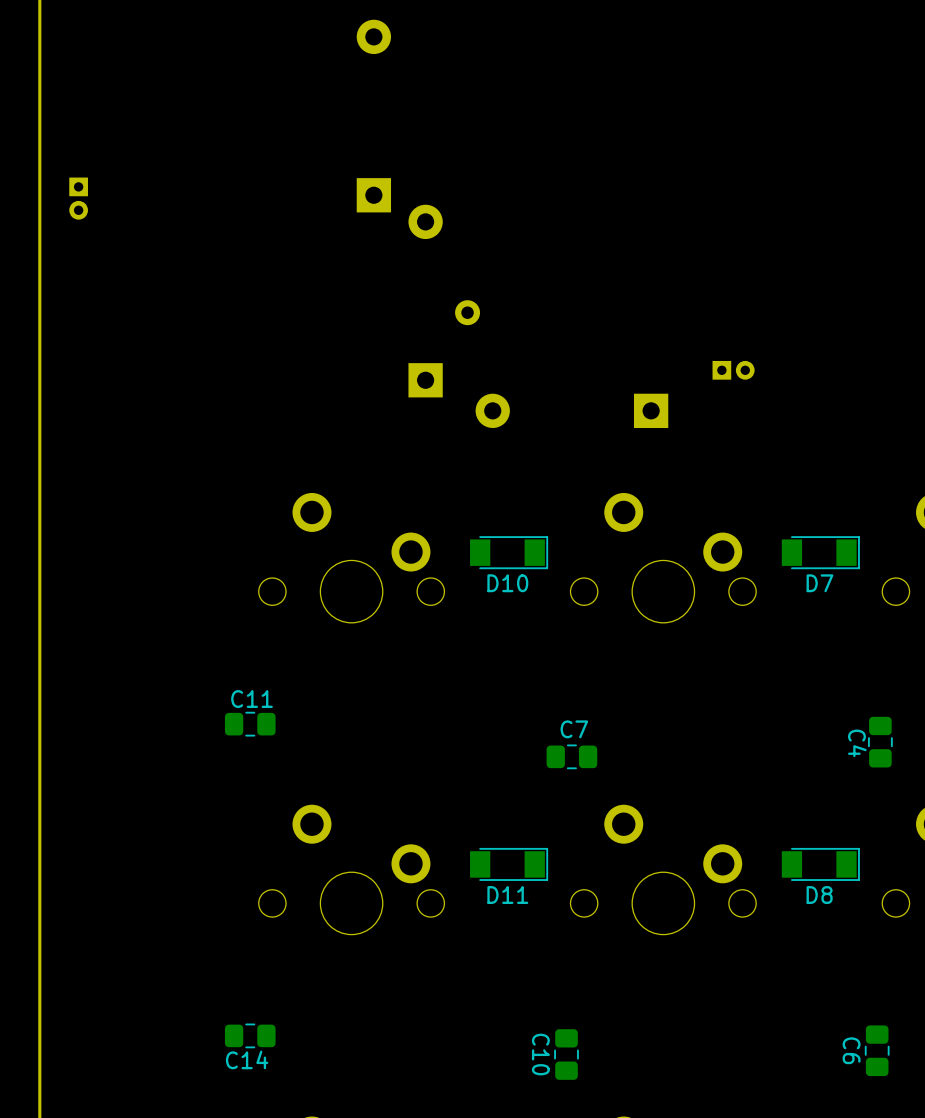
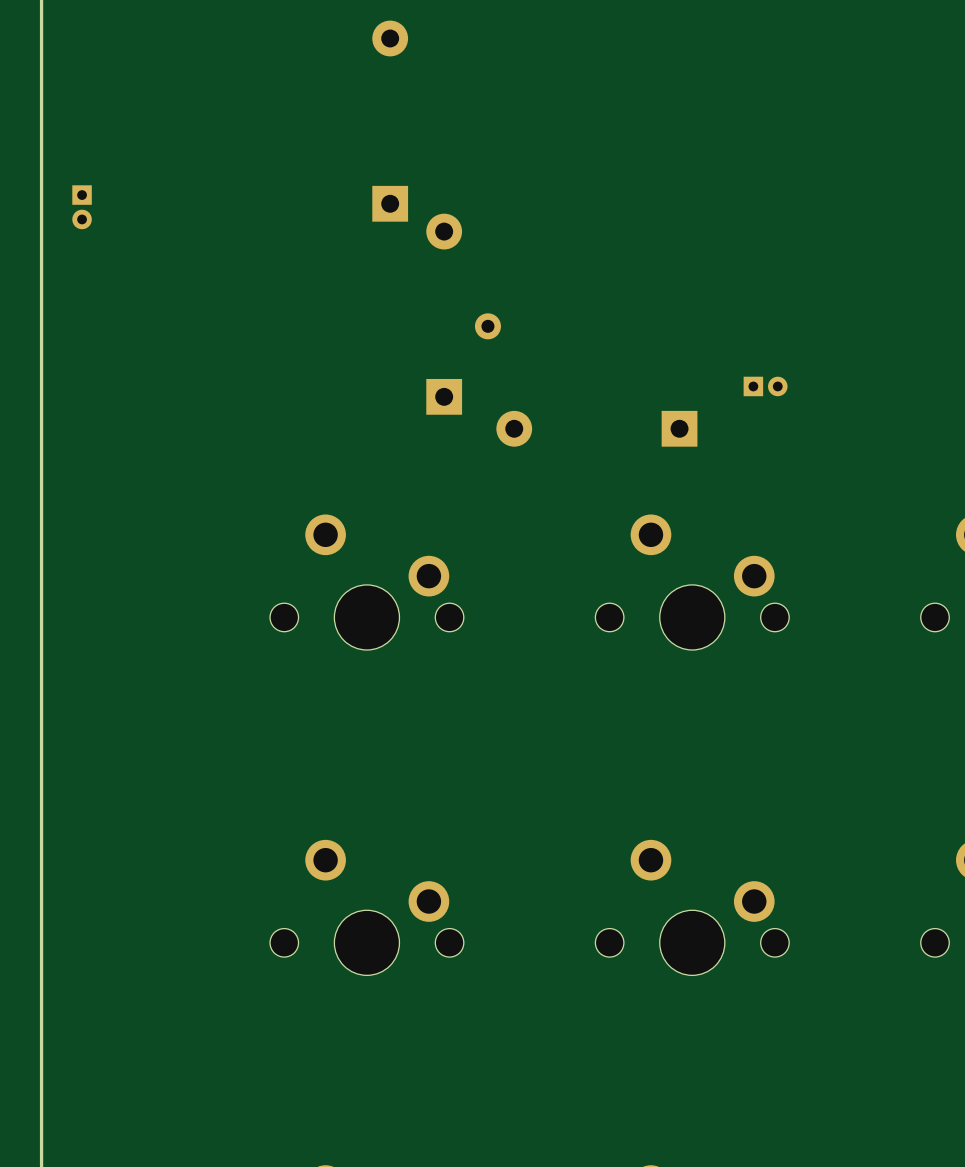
D10: (509, 552) -> none
D7: (820, 552) -> none
C11: (250, 724) -> none
C4: (880, 742) -> none
C7: (571, 756) -> none
D11: (509, 864) -> none
D8: (820, 864) -> none
C14: (250, 1035) -> none
C6: (877, 1050) -> none
C10: (566, 1054) -> none

